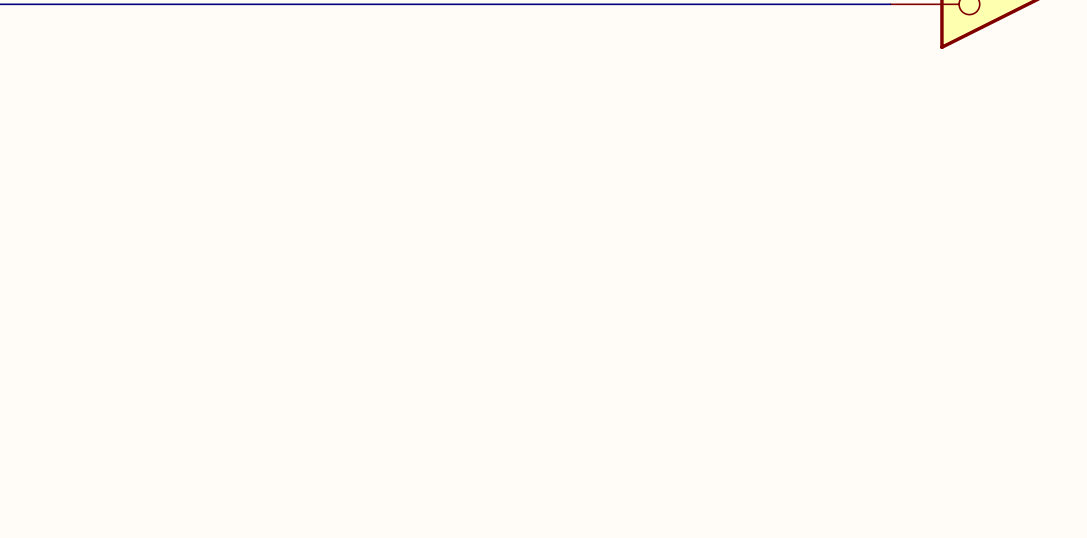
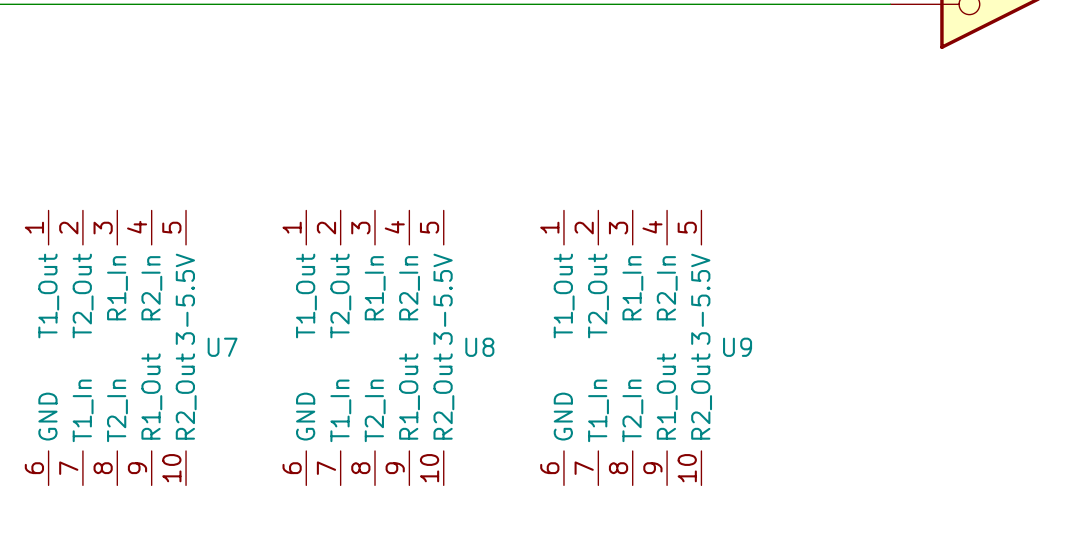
U7: none -> (117, 347)
U8: none -> (375, 347)
U9: none -> (632, 347)

